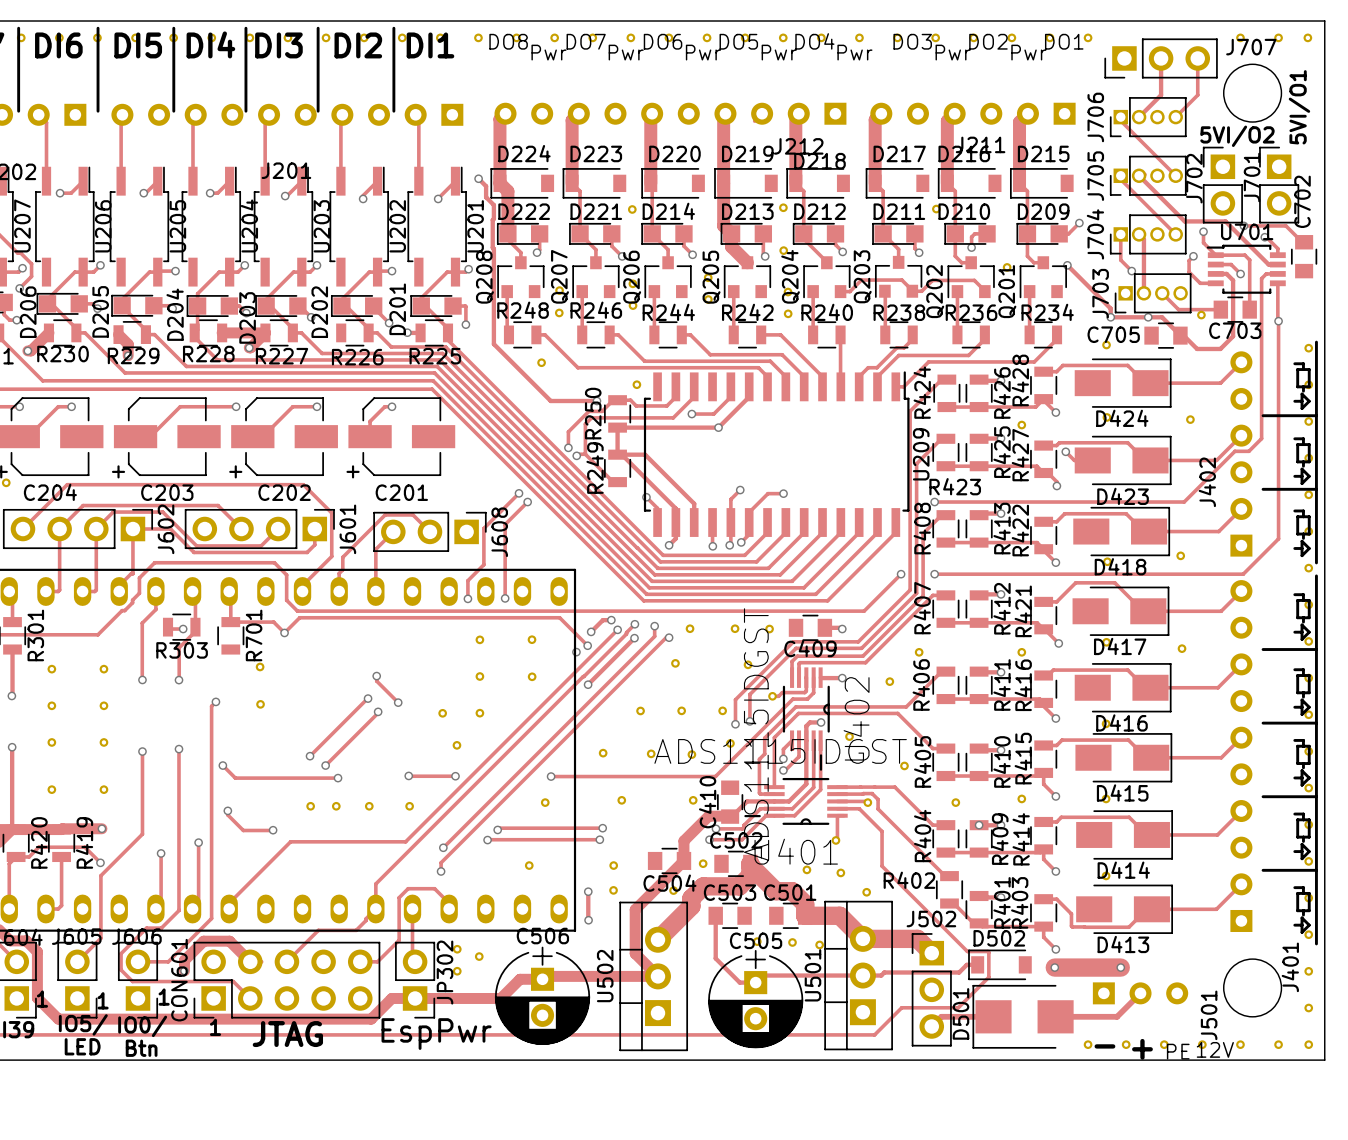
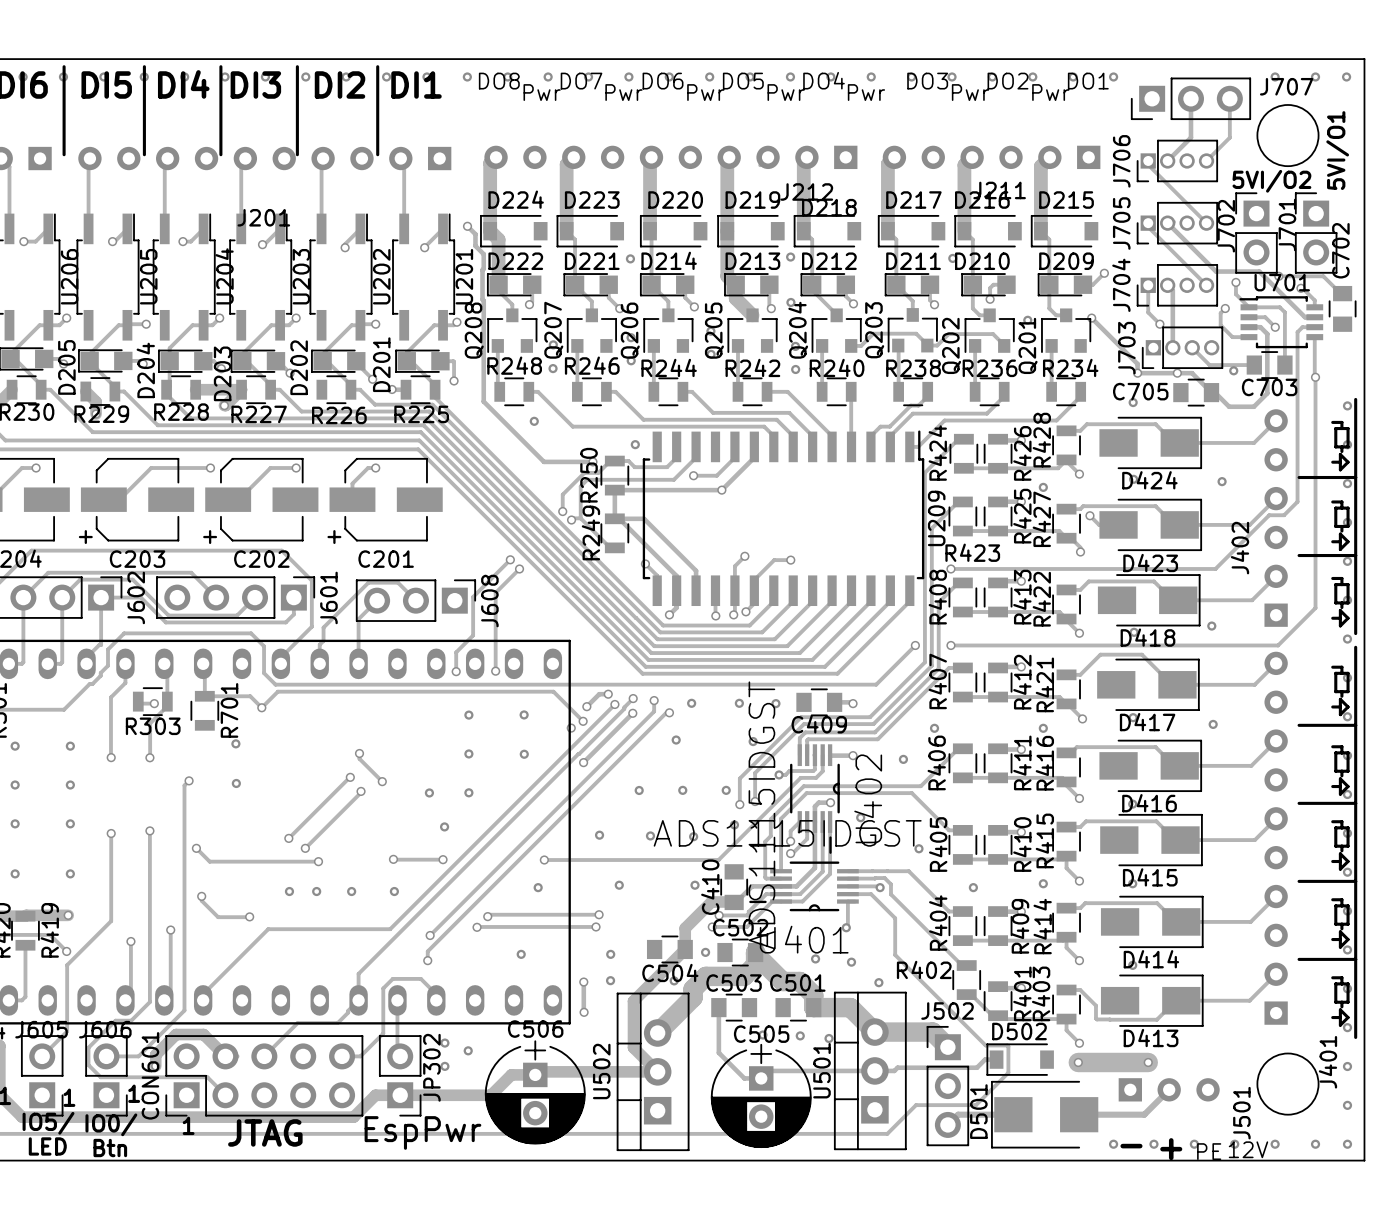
via: (979, 825) -> none

